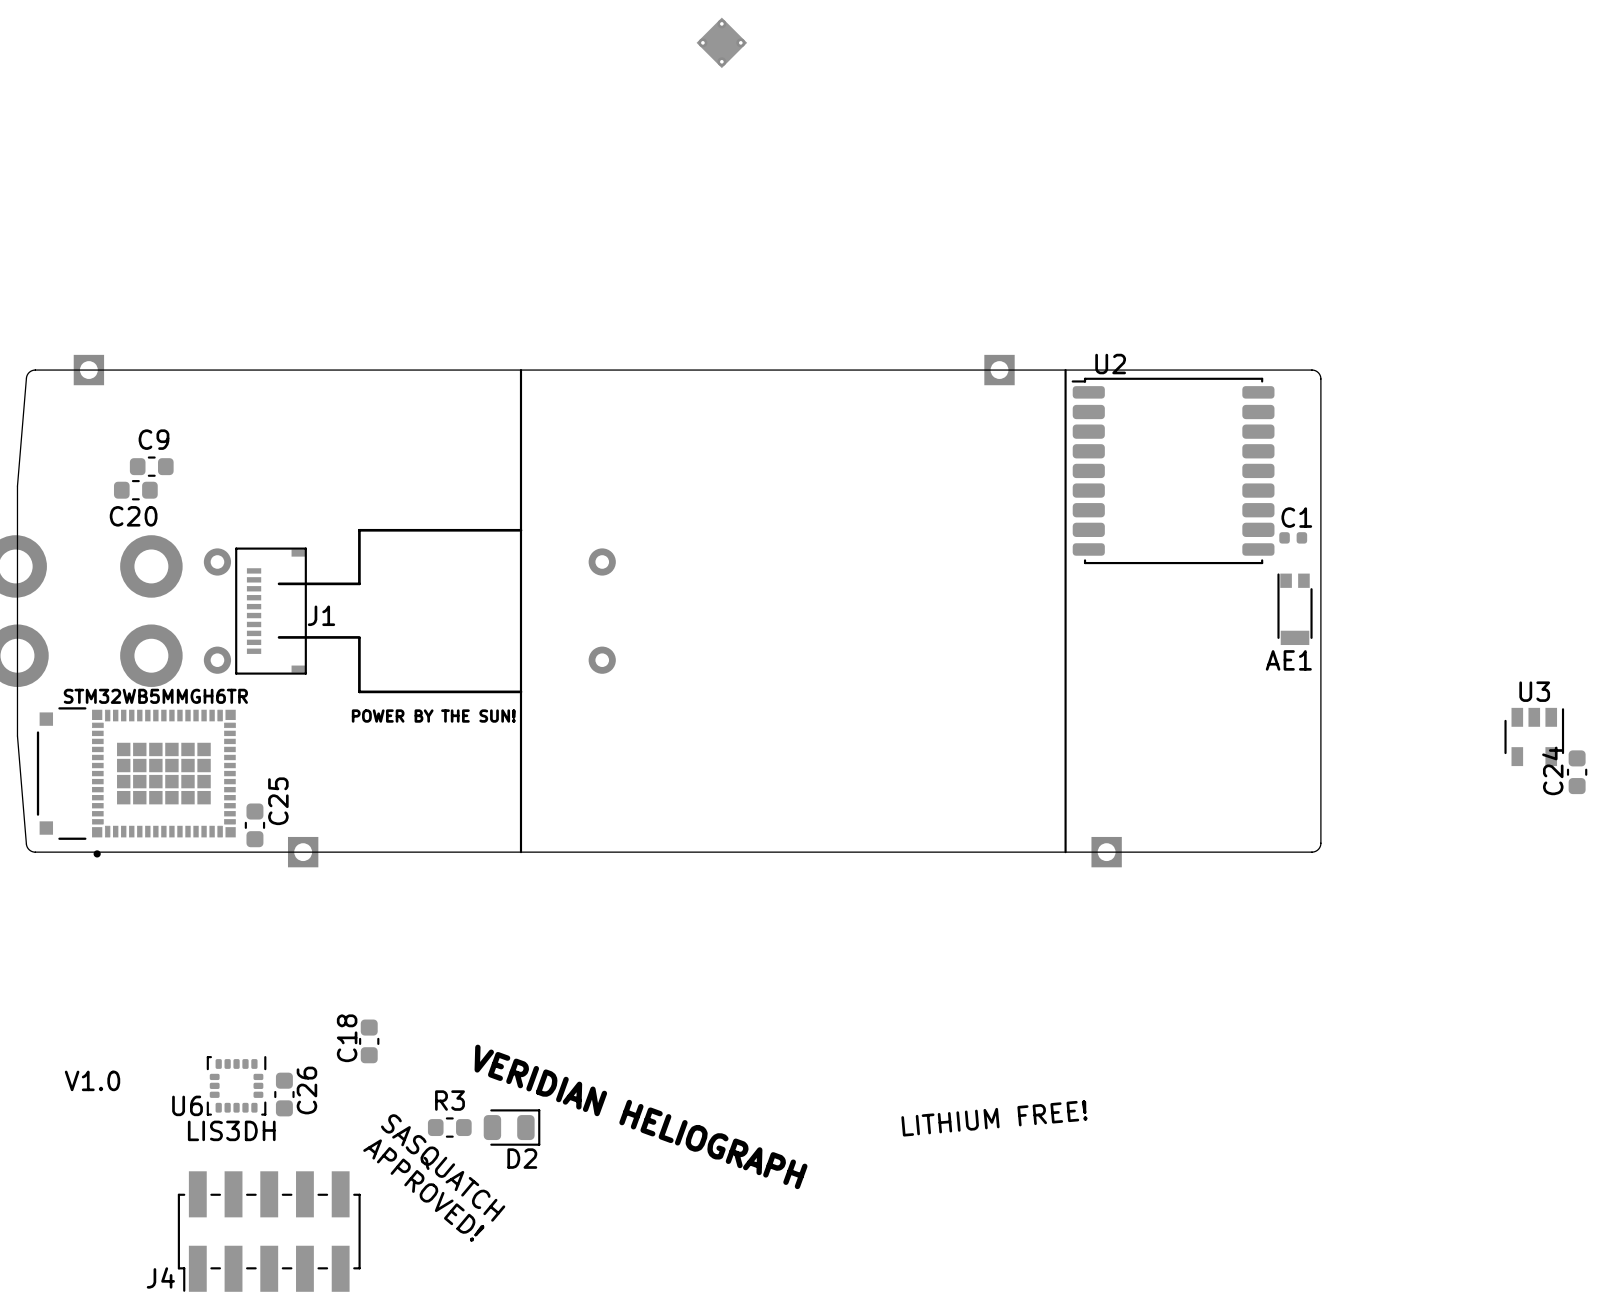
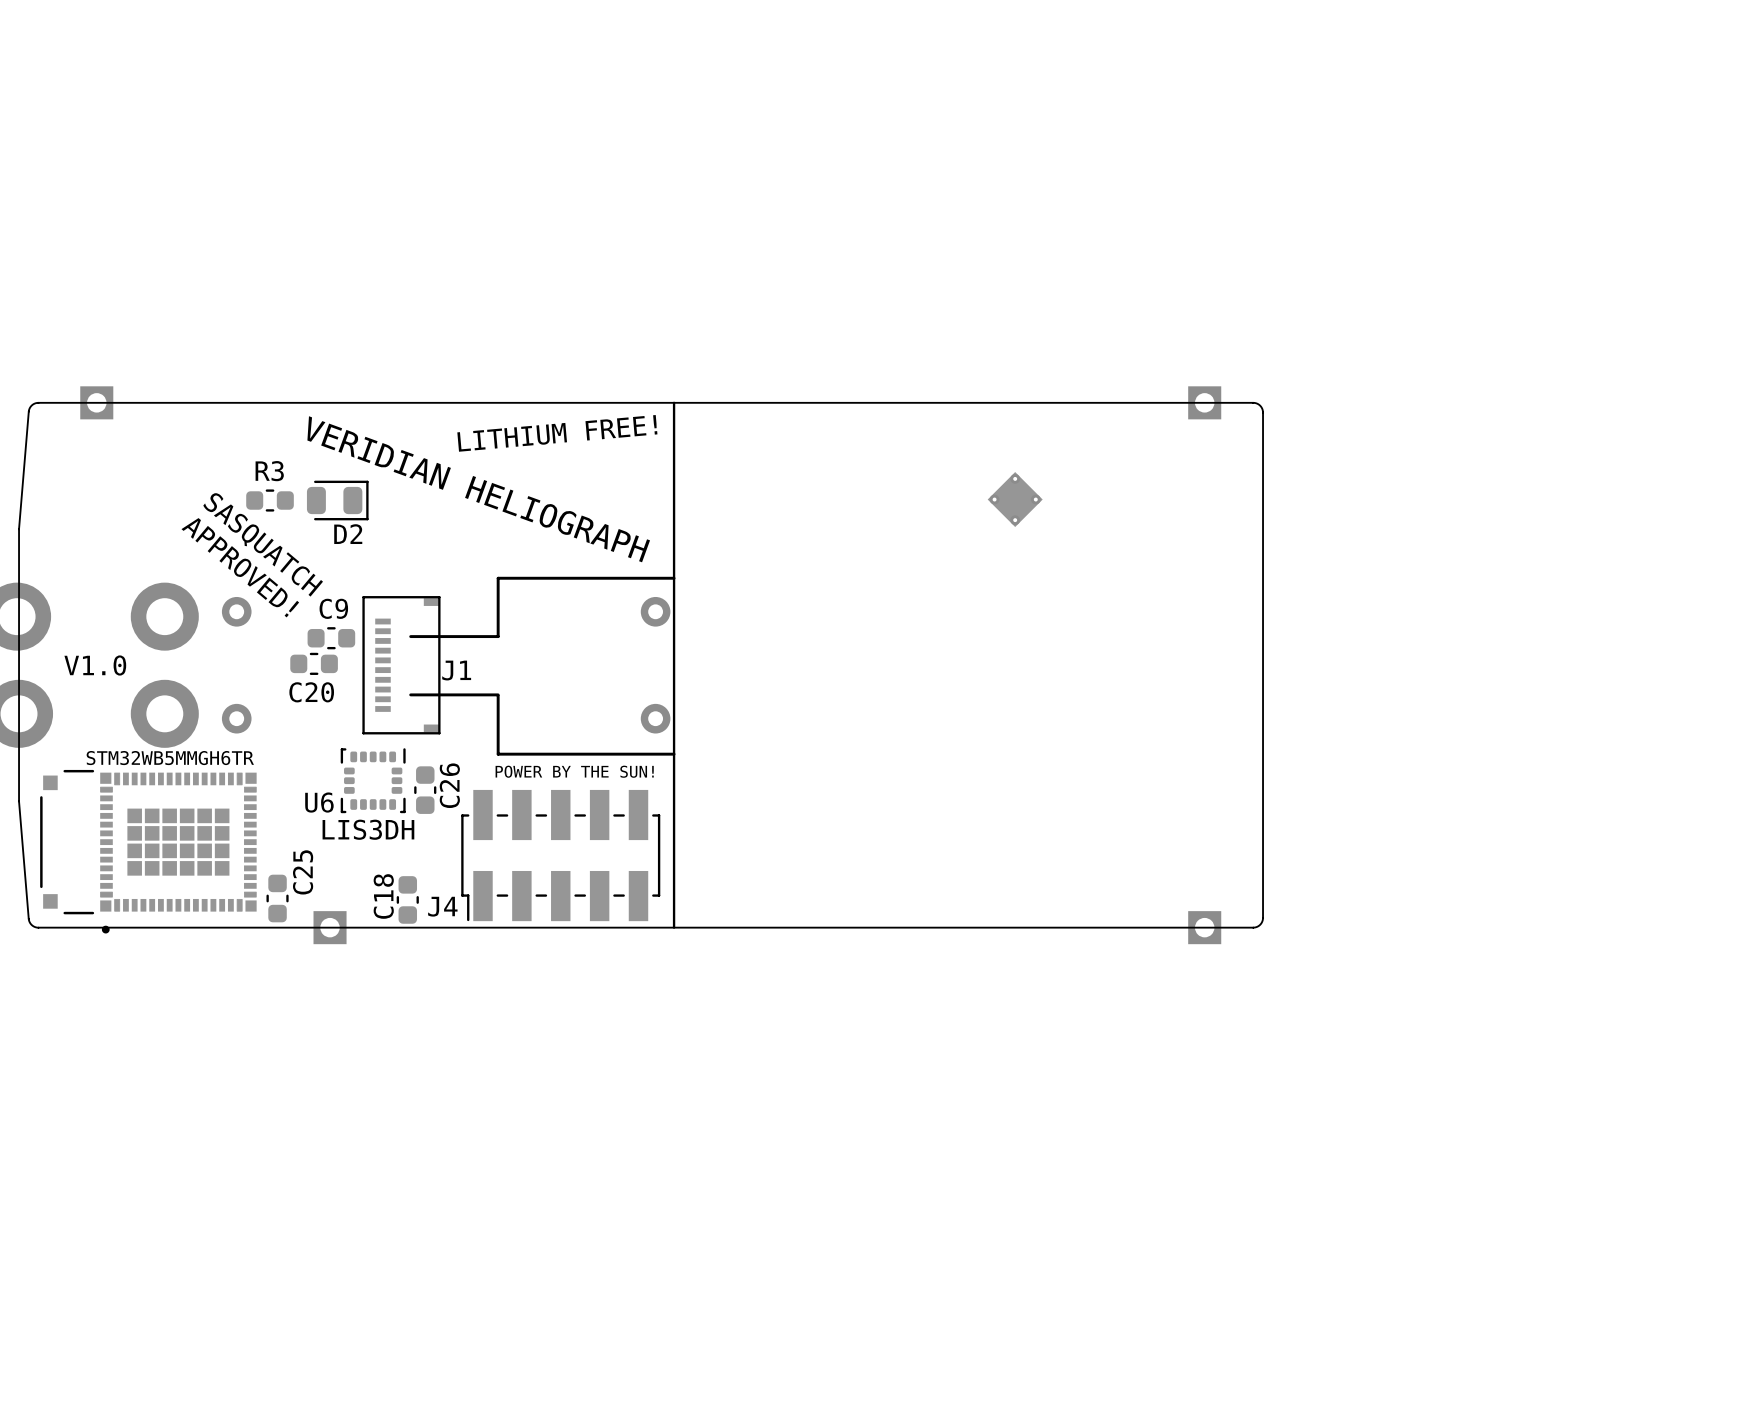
part: (721, 42) -> none
line: (520, 370) (520, 852) -> (674, 402) (674, 927)
part position: (999, 370) -> (1204, 402)
line: (1065, 370) (1065, 852) -> none
board edge: (1151, 370) (1311, 370) (1318, 372) (1320, 378) (1320, 846) (1311, 852) (1151, 852) -> (1253, 402) (1260, 405) (1263, 412) (1263, 917) (1260, 924) (1253, 927)
text: none -> LITHIUM FREE! (557, 433)
text: none -> VERIDIAN HELIOGRAPH (478, 489)
part: none -> (1015, 499)
C9 position: (151, 466) -> (331, 638)
U2: (1173, 470) -> none
C20 position: (135, 490) -> (314, 663)
text: none -> SASQUATCH (263, 544)
text: none -> APPROVED! (240, 567)
line: (520, 530) (359, 530) (359, 583) (279, 583) -> (674, 578) (498, 578) (498, 636) (410, 636)
C1: (1293, 537) -> none
AE1: (1295, 609) -> none
text: none -> V1.0 (95, 665)
J1 position: (271, 611) -> (401, 665)
line: (279, 637) (359, 637) -> (410, 694) (498, 694)
line: (359, 638) (359, 691) (520, 691) -> (498, 695) (498, 754) (674, 754)
text position: POWER BY THE SUN! (433, 716) -> POWER BY THE SUN! (574, 771)
U3: (1534, 736) -> none
C24: (1577, 772) -> none
C18 position: (369, 1041) -> (407, 899)
text: V1.0 (92, 1080) -> none
U6 position: (236, 1085) -> (373, 780)
C26 position: (284, 1094) -> (425, 790)
text: VERIDIAN HELIOGRAPH (641, 1116) -> none
text: LITHIUM FREE! (994, 1118) -> none
R3 position: (449, 1127) -> (270, 500)
D2 position: (512, 1127) -> (337, 500)
text: SASQUATCH (443, 1167) -> none
text: APPROVED! (423, 1190) -> none
J4 position: (269, 1231) -> (560, 855)

